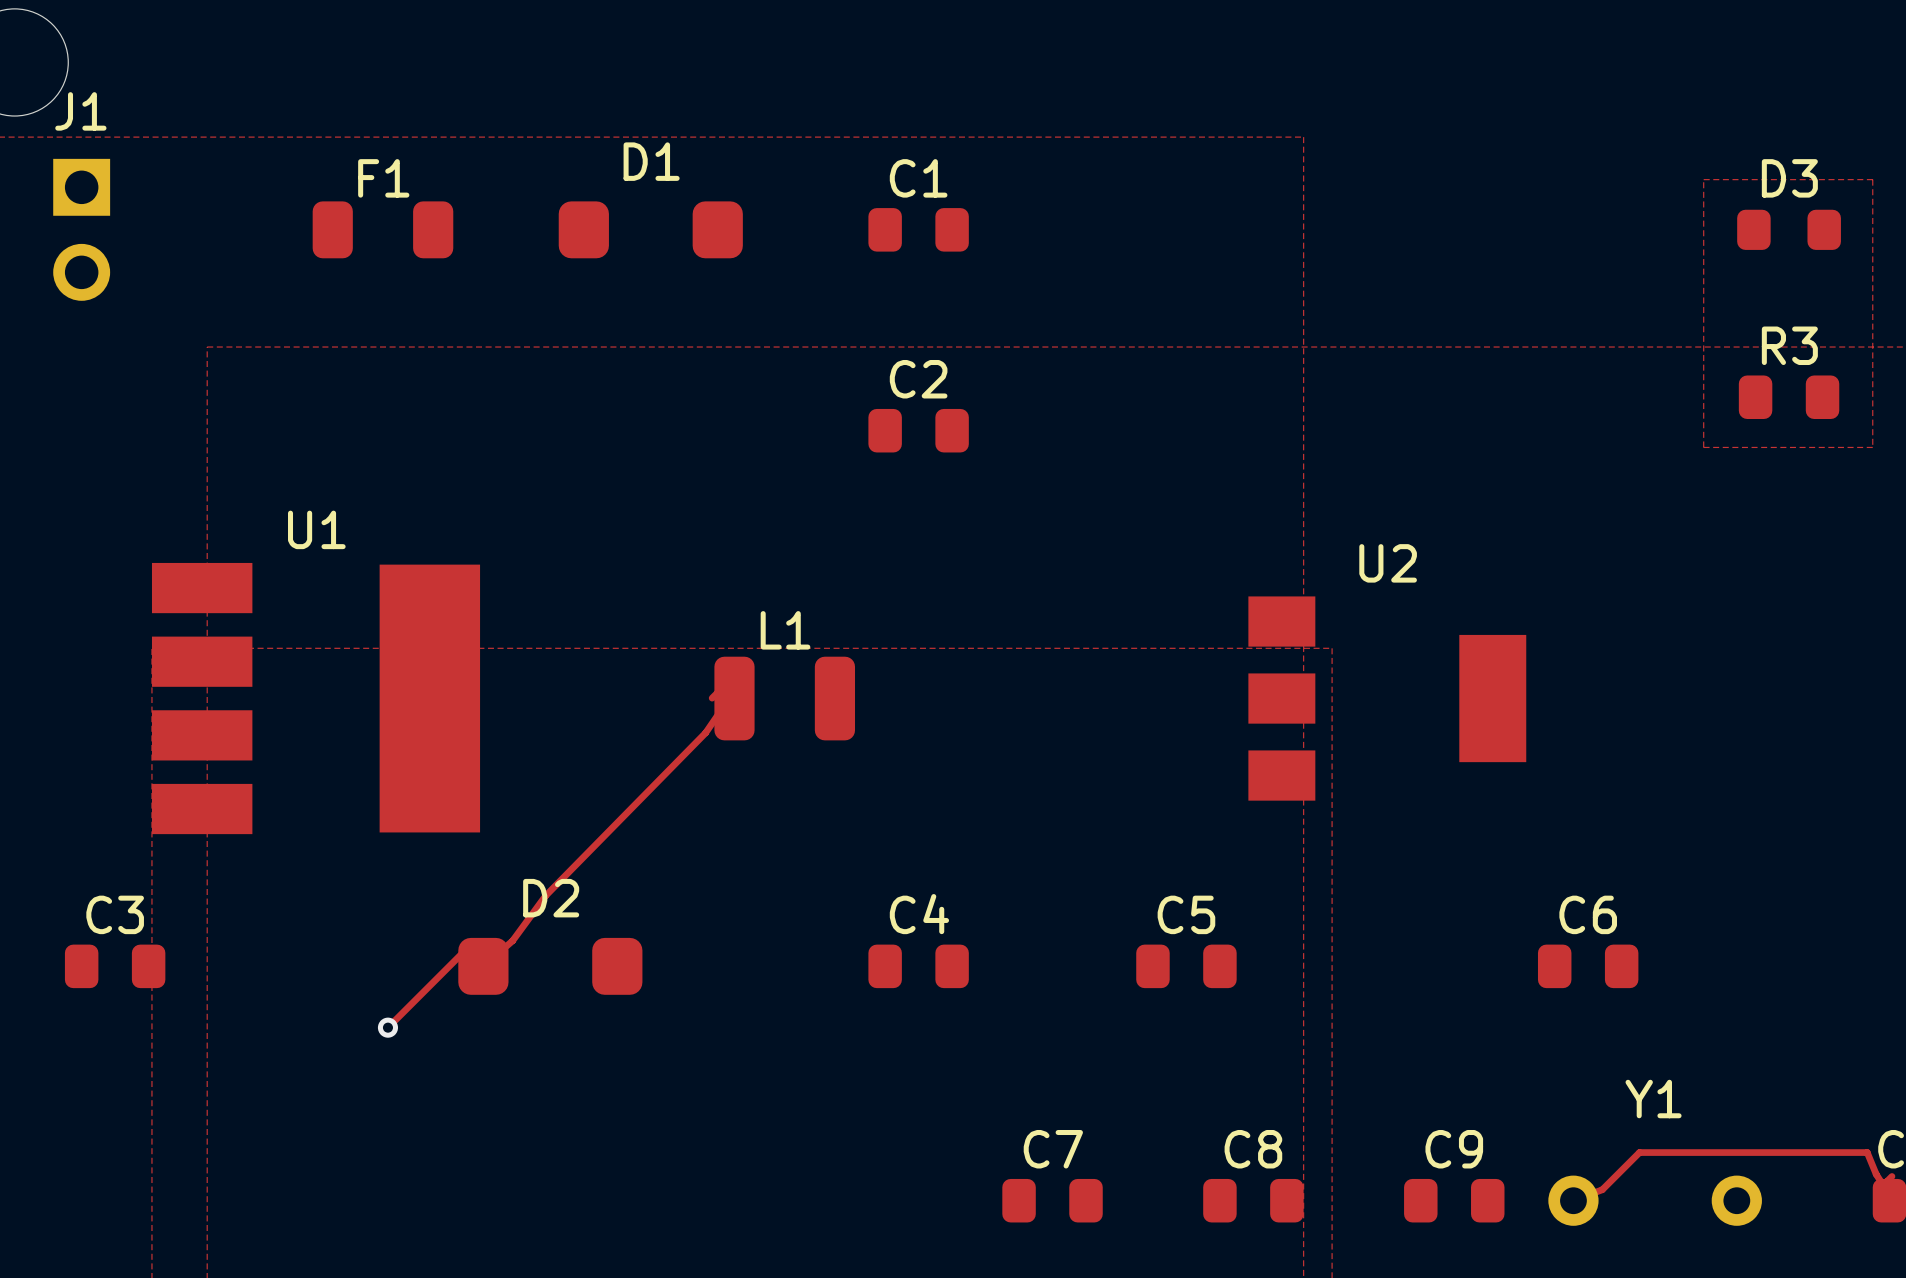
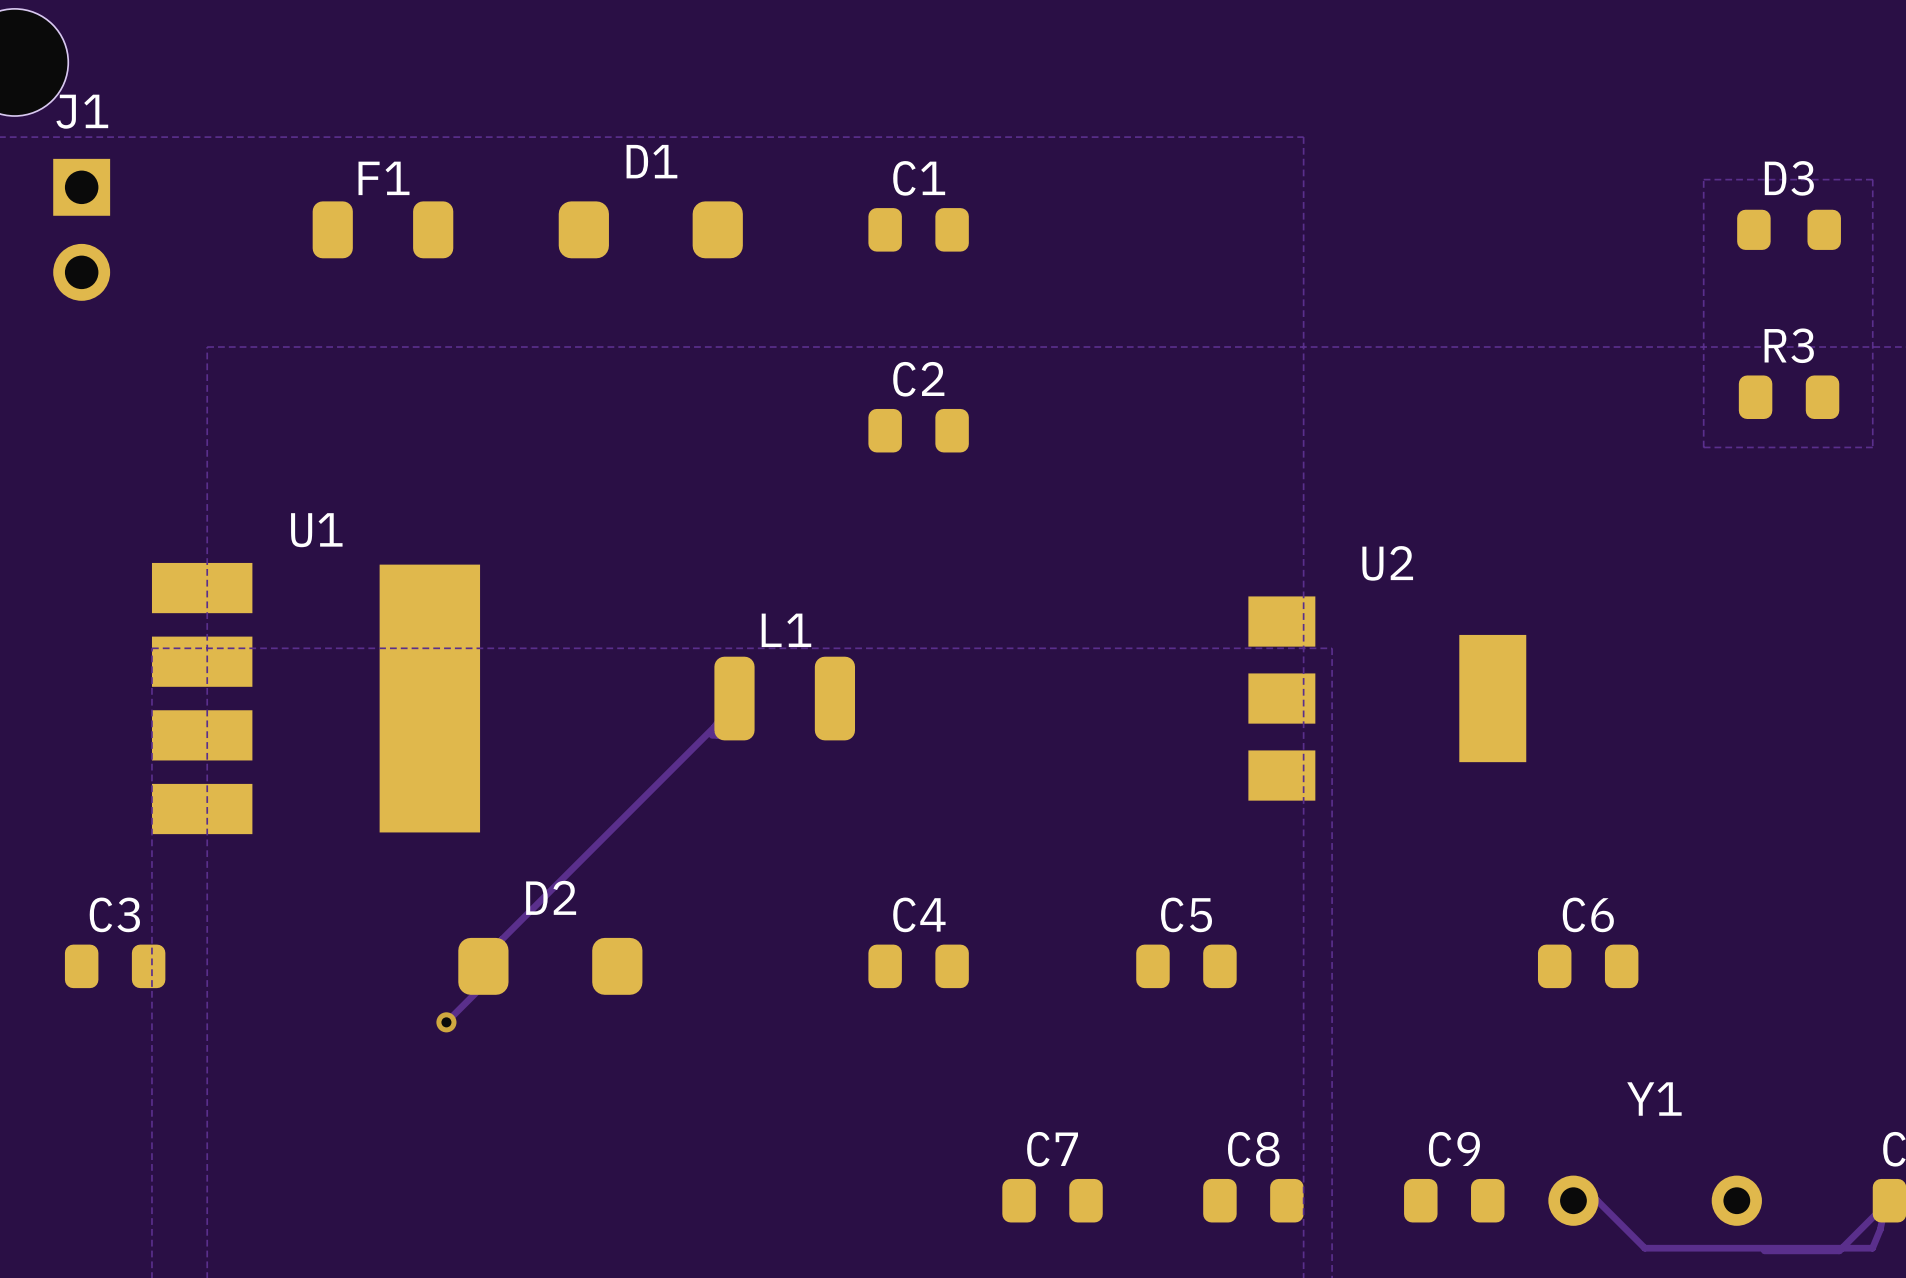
track: (712, 698) (717, 692) (734, 698) (725, 703) (705, 732) (545, 895) (512, 940) (483, 966) (462, 953) (387, 1027) -> none
track: none -> (712, 735) (717, 735) (734, 698) (714, 727) (501, 939) (483, 966) (478, 990) (446, 1022)
via position: (387, 1027) -> (446, 1022)
track: (1891, 1176) (1886, 1181) (1889, 1200) (1867, 1152) (1639, 1152) (1602, 1189) (1573, 1200) -> (1764, 1250) (1839, 1250) (1889, 1200) (1872, 1248) (1644, 1248) (1597, 1200) (1573, 1200)

